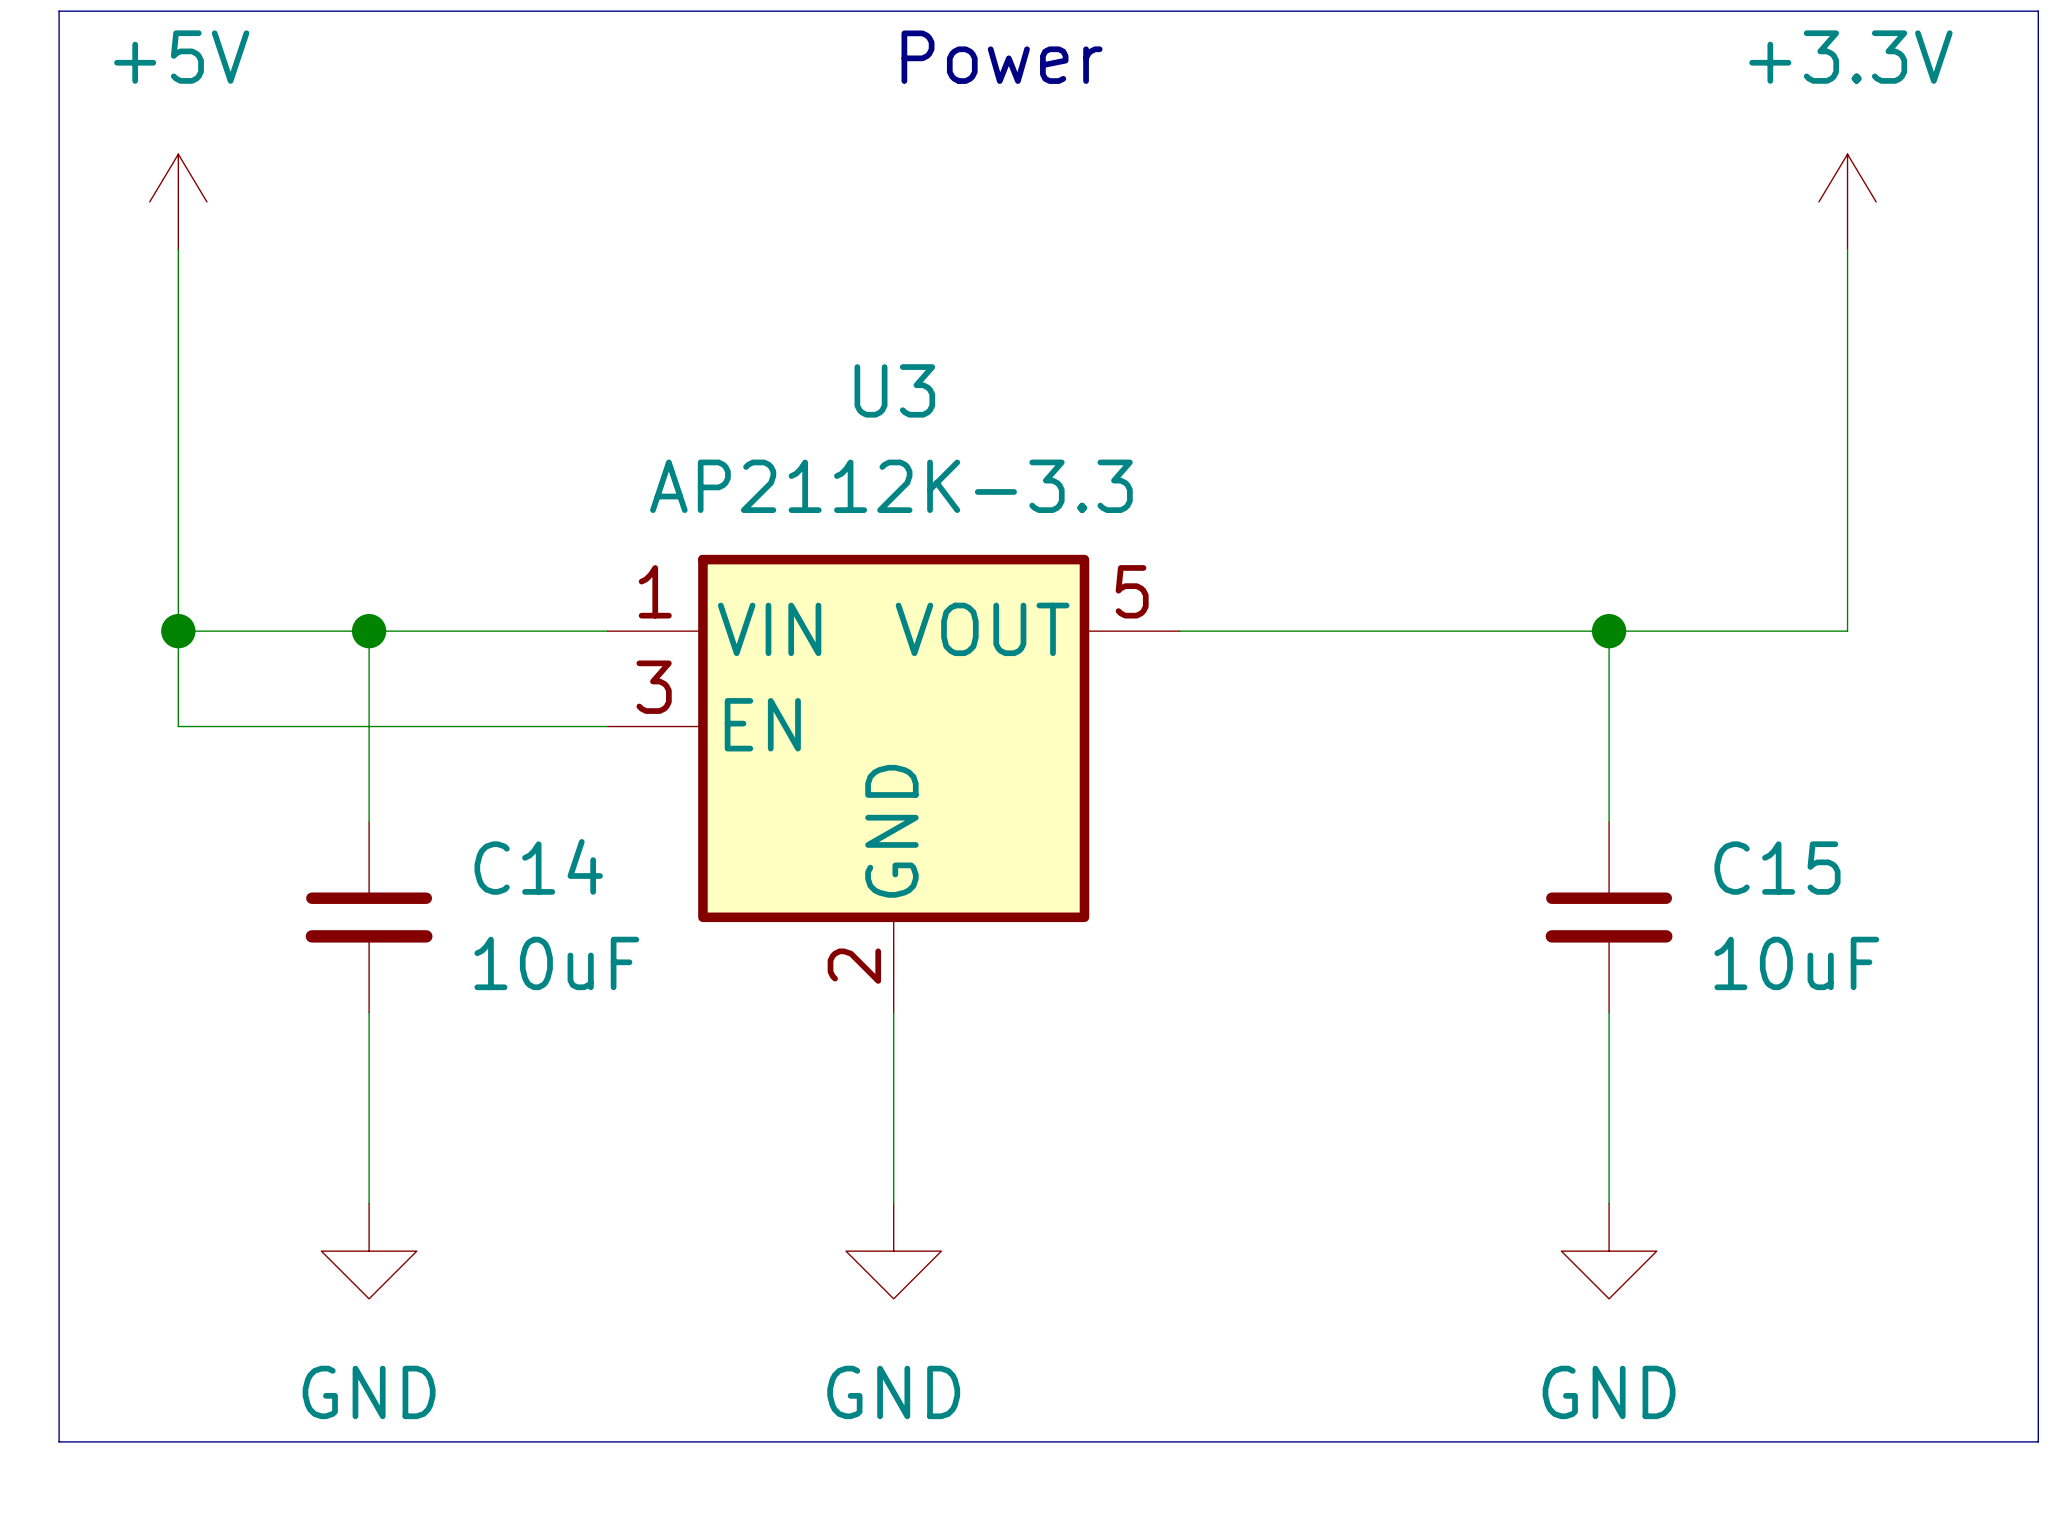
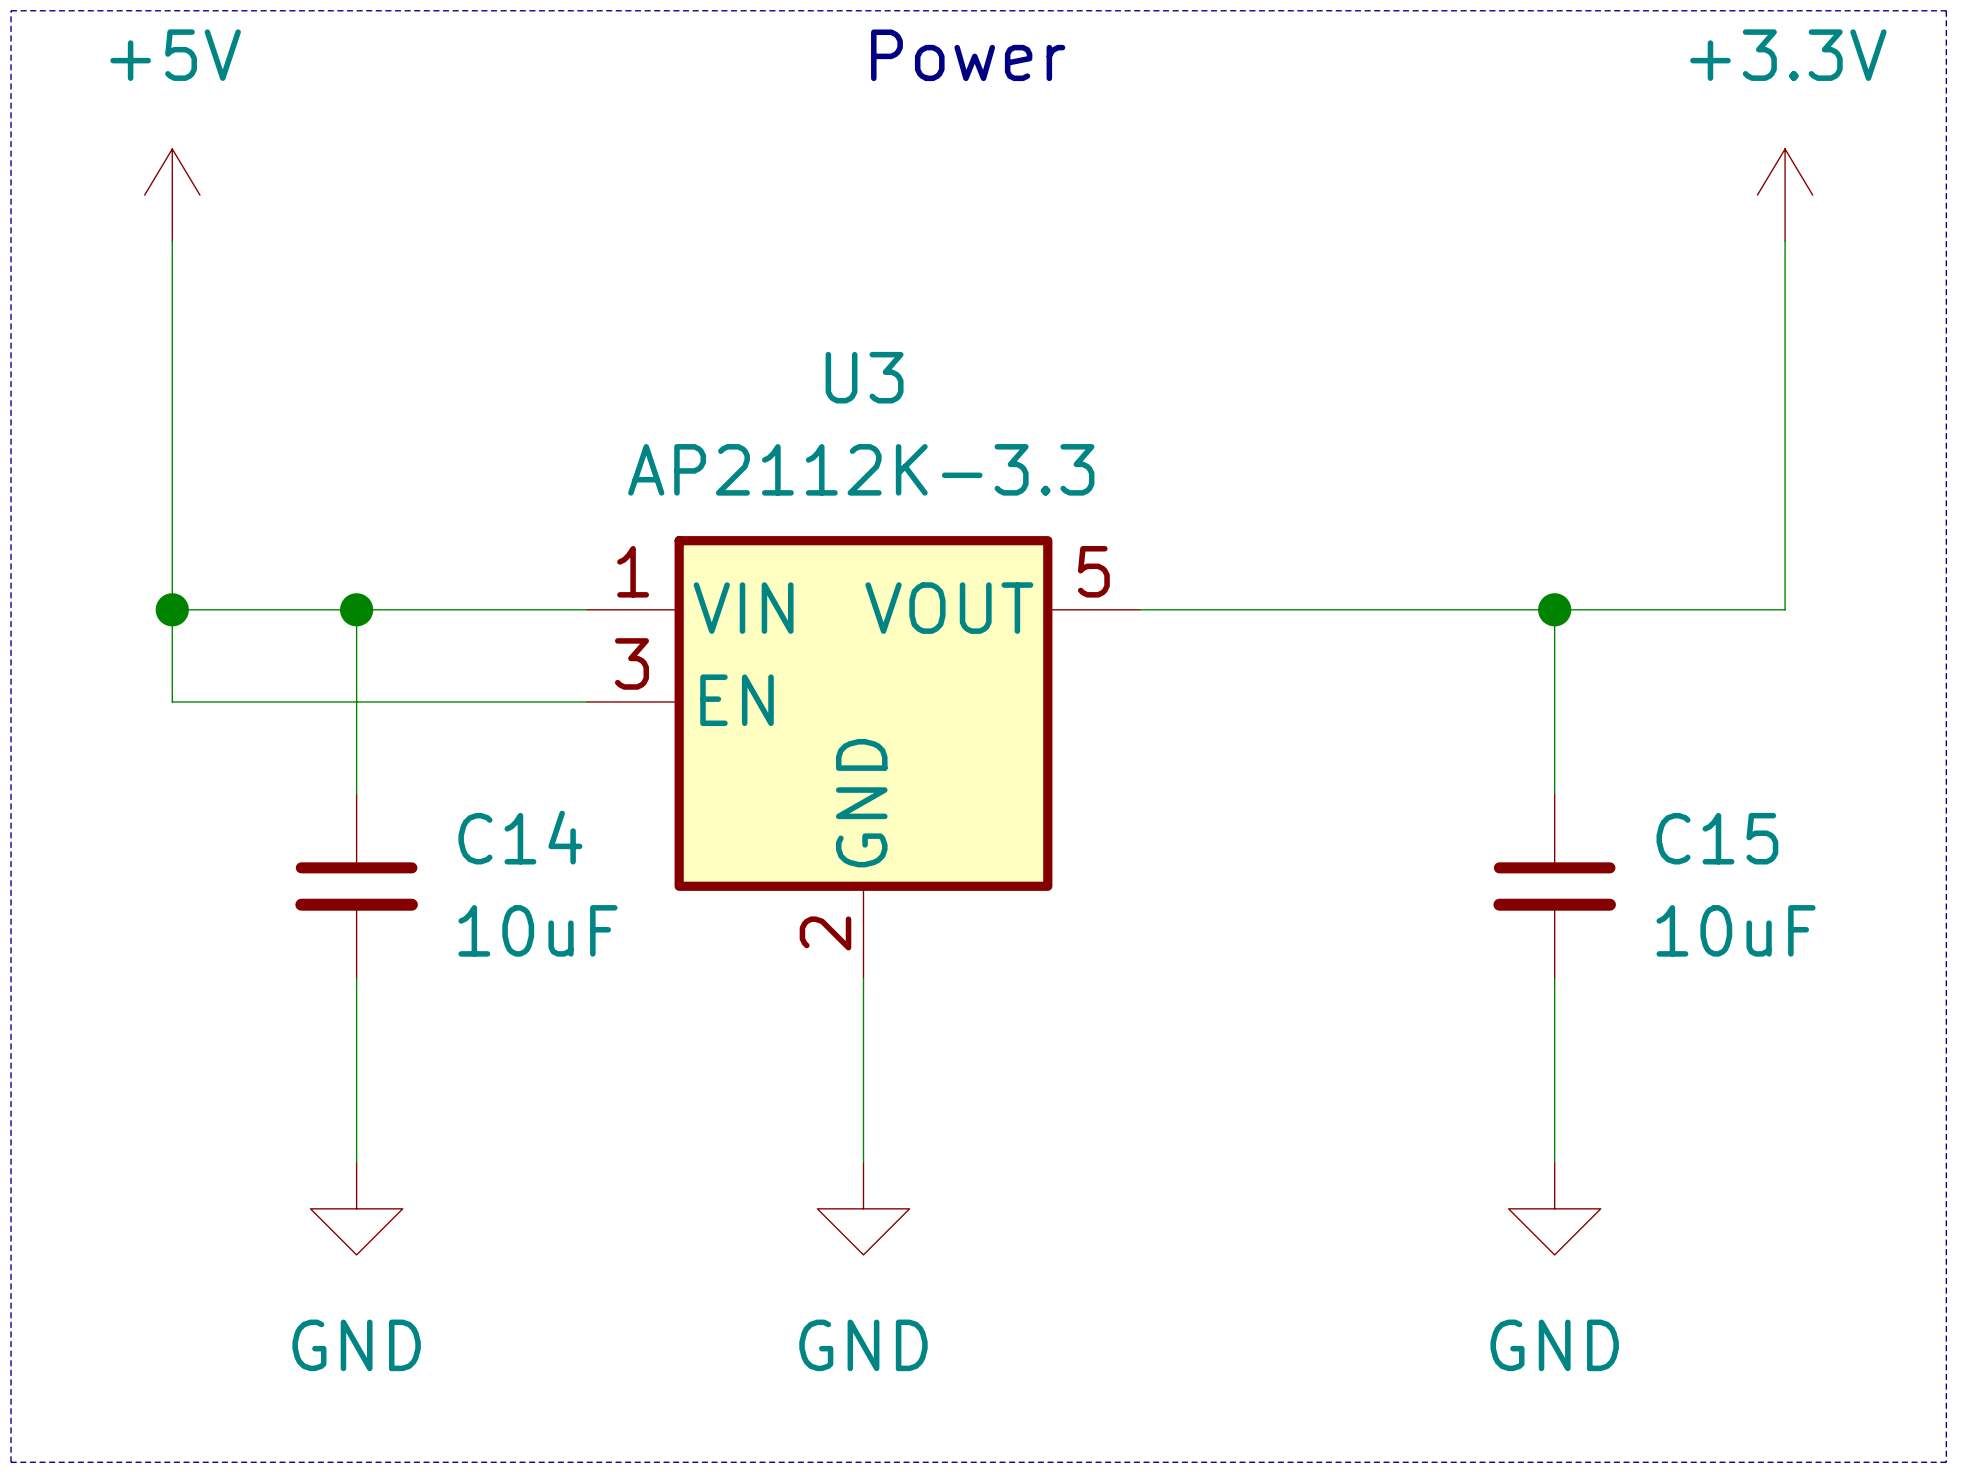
line: none -> (11, 10) (1946, 10) (1946, 1462) (11, 1462) (11, 10)
bus: (59, 11) (2038, 11) (2038, 1441) (59, 1441) (59, 11) -> none

